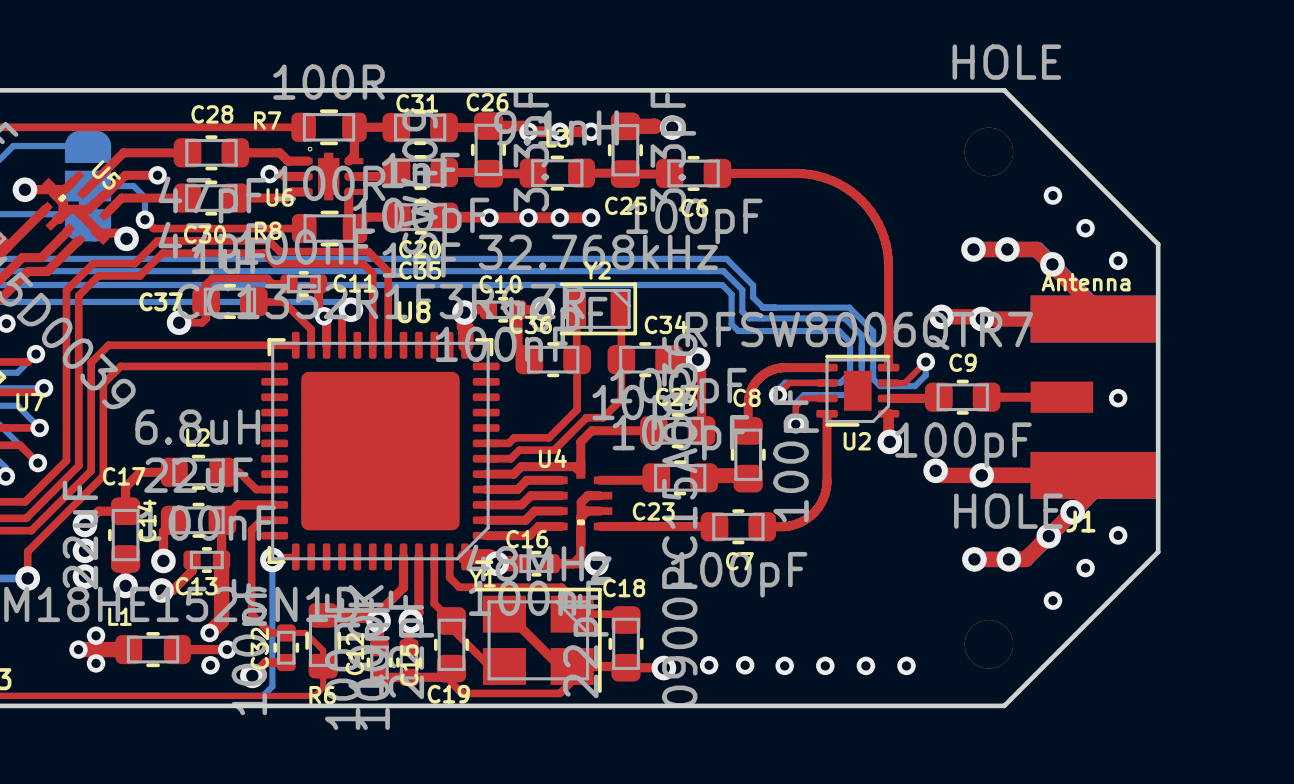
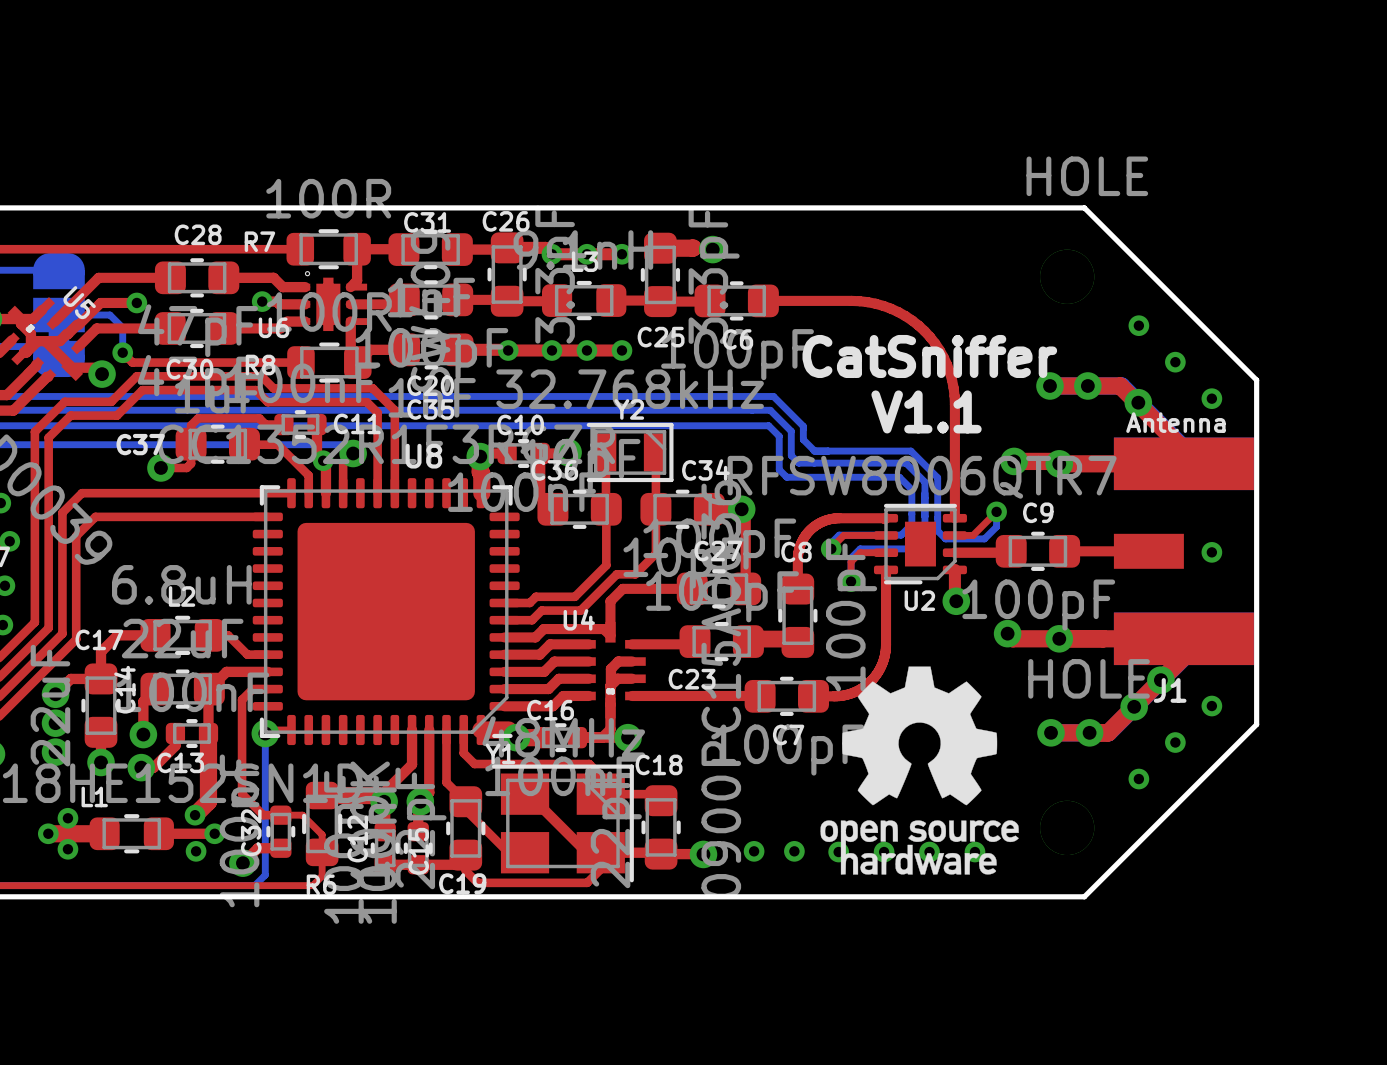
text: none -> CatSniffer (929, 356)
text: none -> V1.1 (926, 411)
drawing: none -> [820, 666, 1019, 875]

